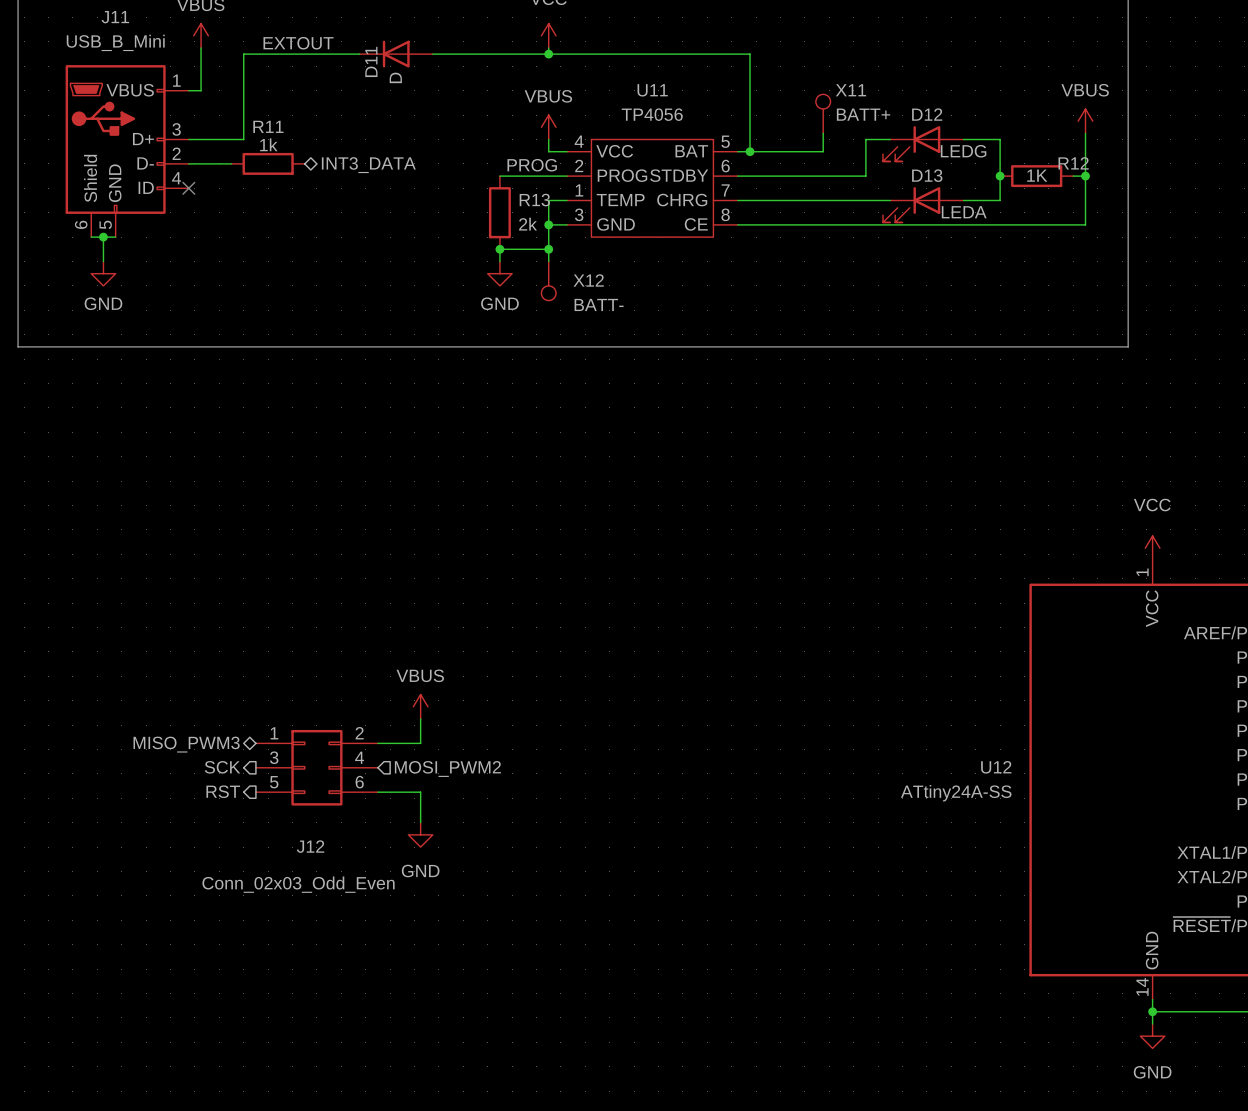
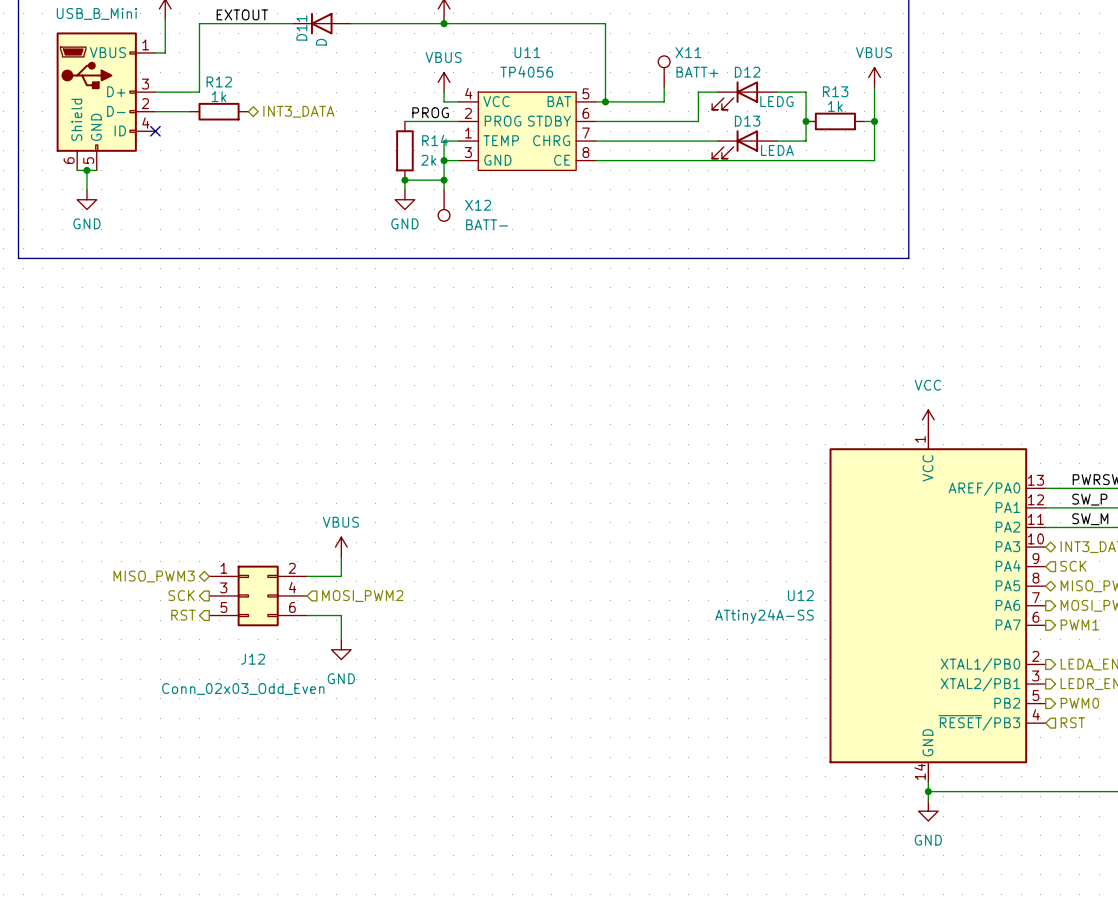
R11 name: R11 (268, 126) -> R12 (219, 81)
R12 name: R12 (1073, 163) -> R13 (835, 91)
R12 value: 1K (1037, 175) -> 1k (835, 106)
R13 name: R13 (534, 200) -> R14 (435, 140)

